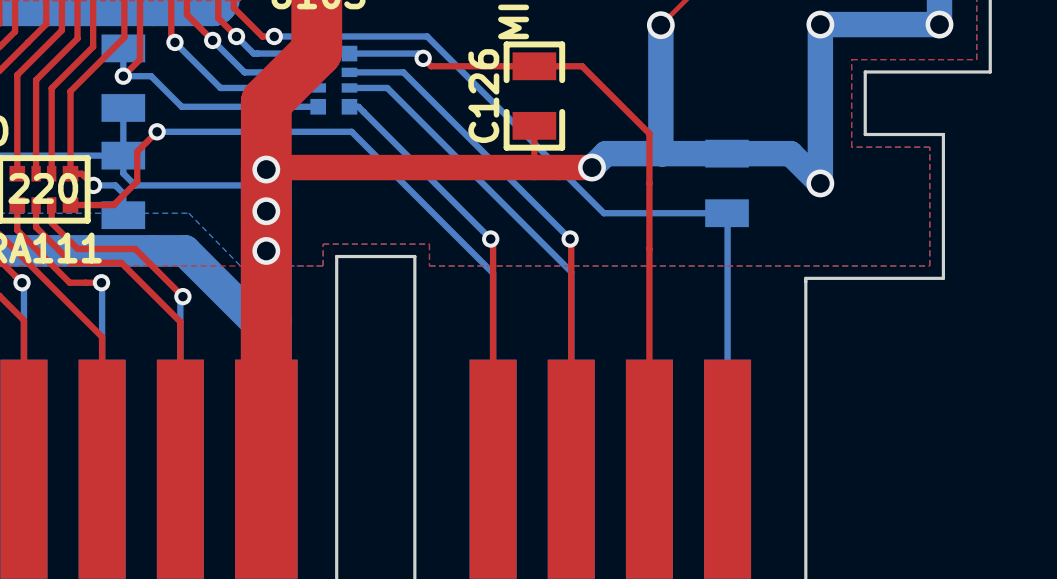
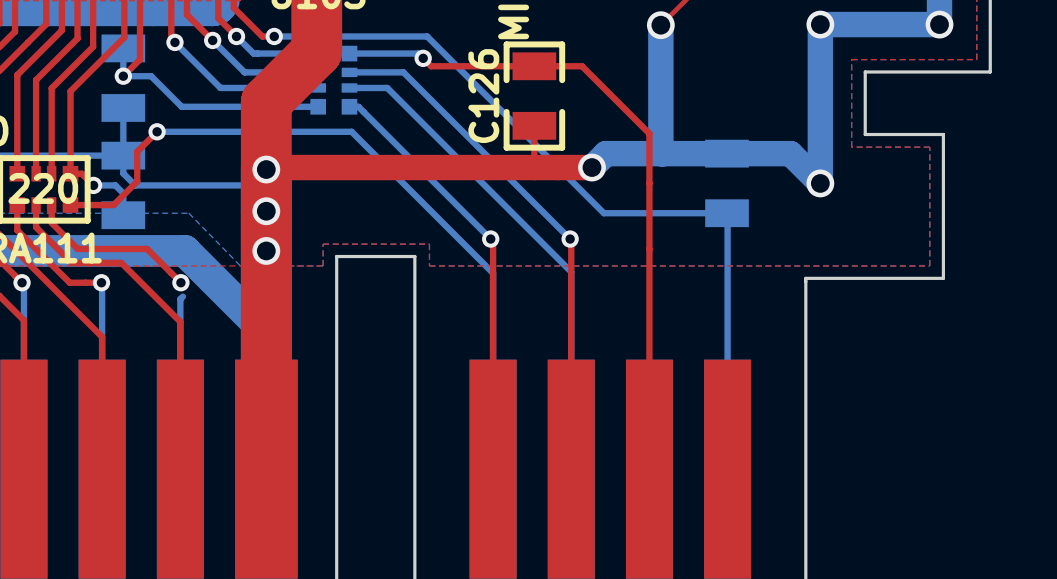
top track: (135, 248) (182, 296) -> (135, 248) (147, 248) (180, 282)
via position: (182, 296) -> (180, 282)

